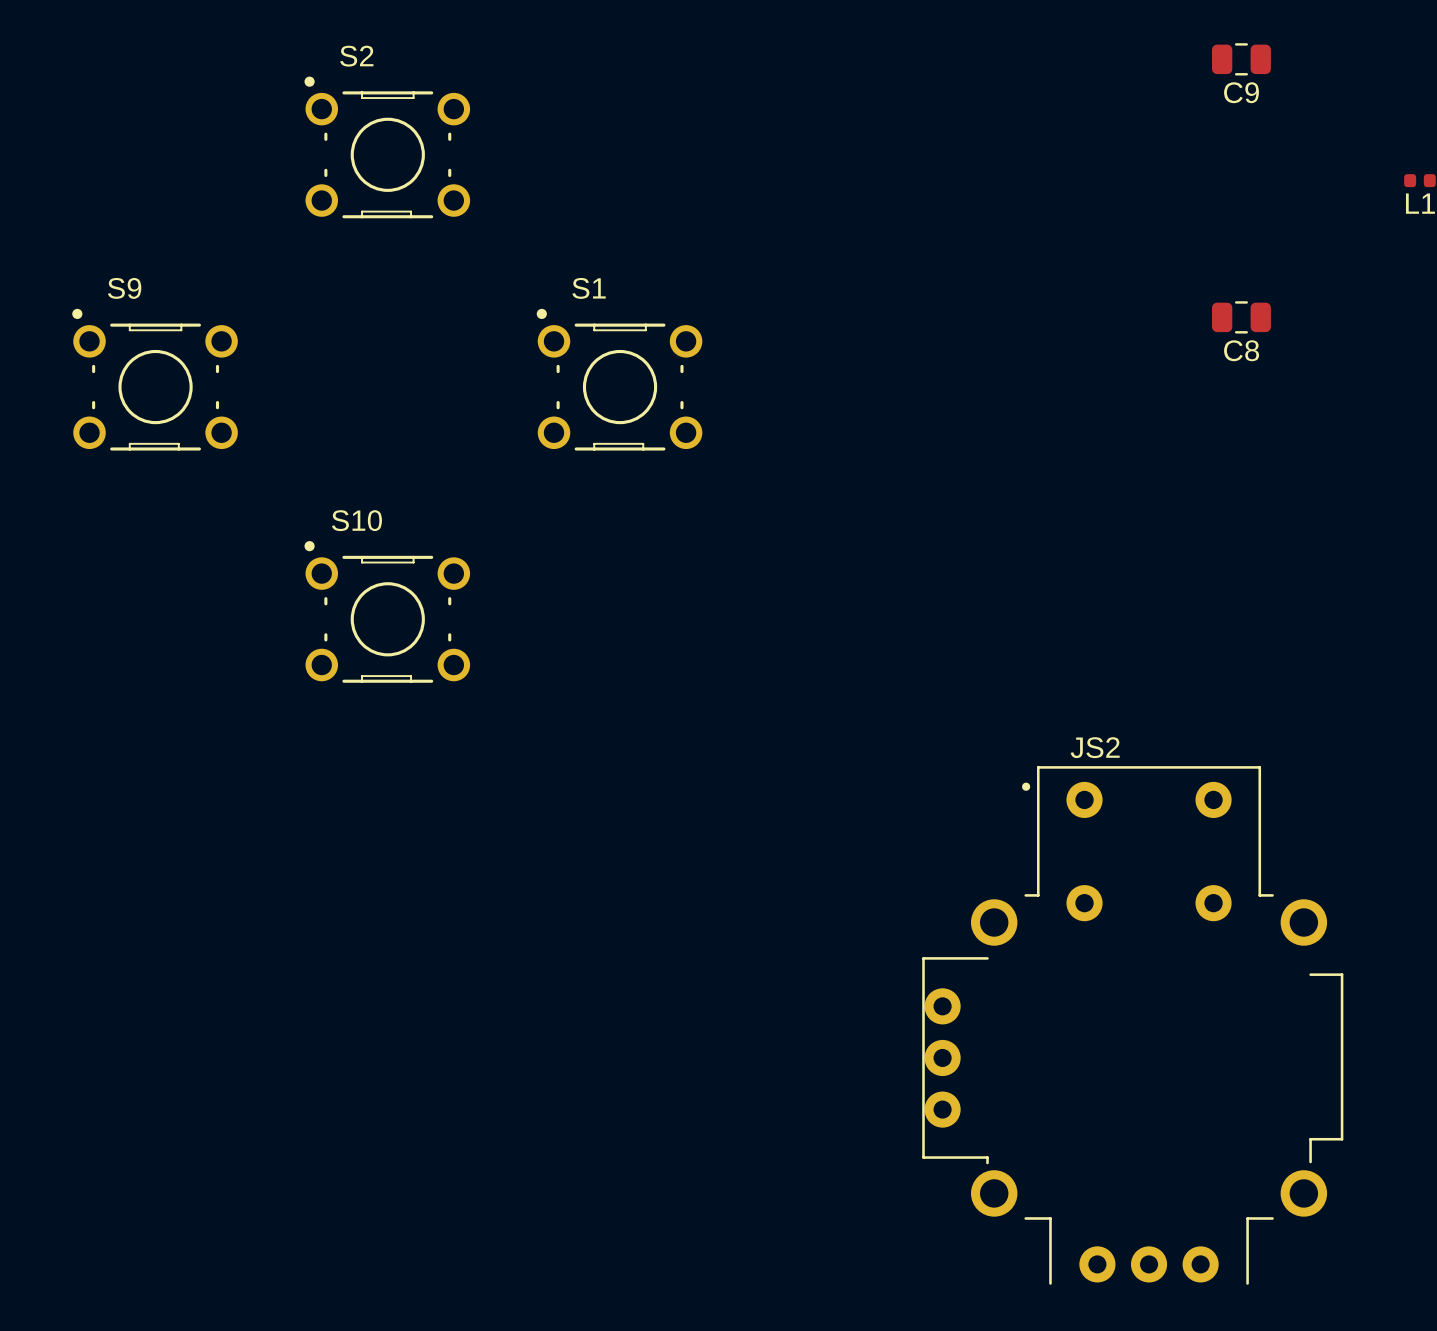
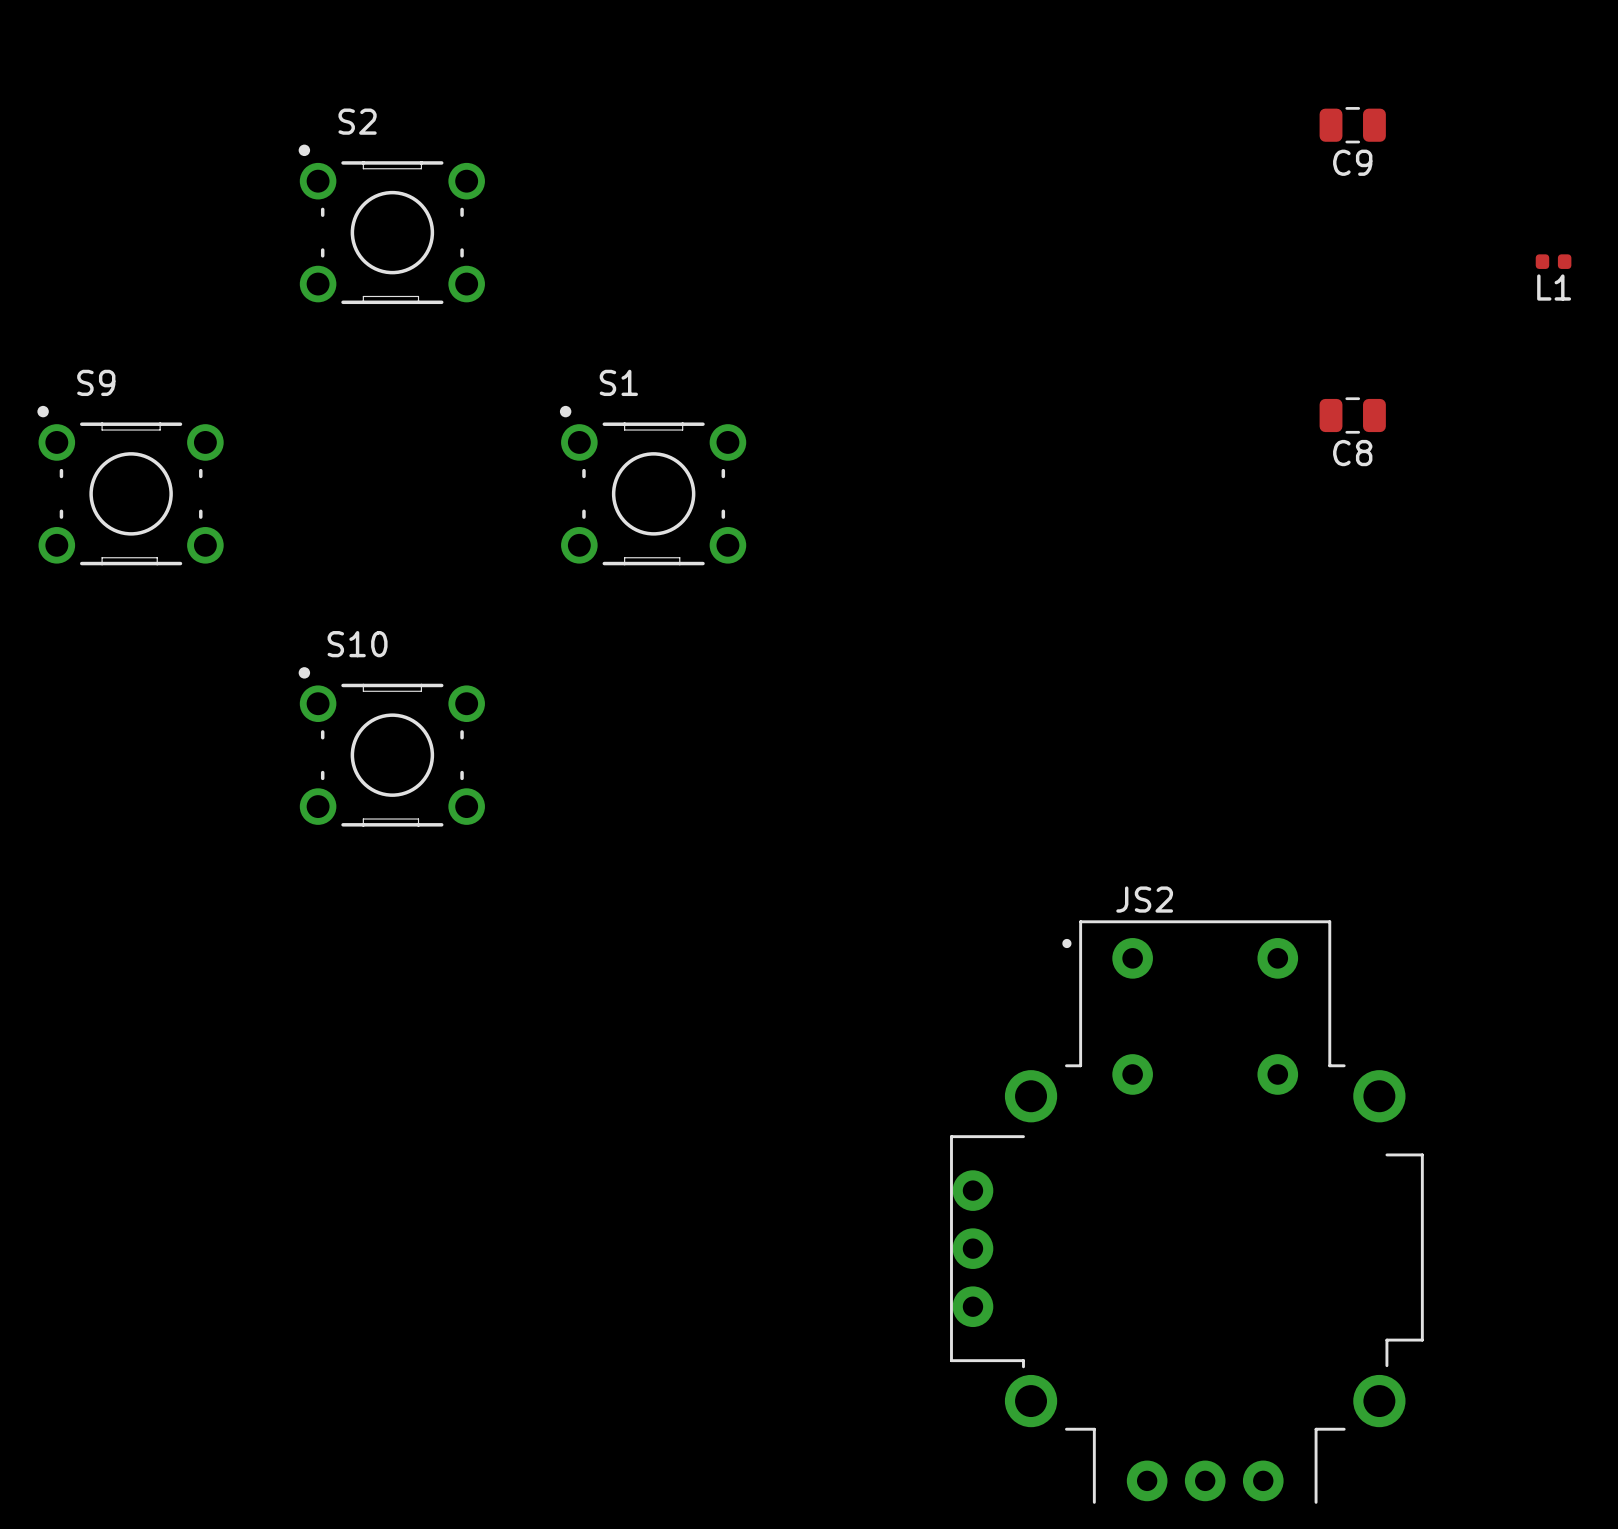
JS2 position: (1132, 1025) -> (1186, 1212)

